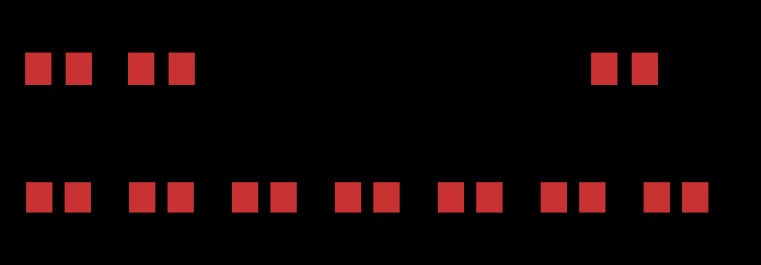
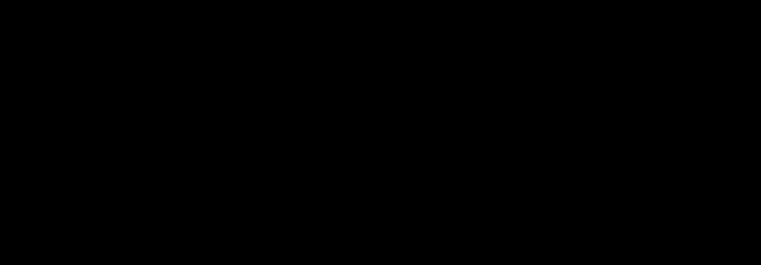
part: (58, 68) -> none
part: (161, 68) -> none
part: (624, 68) -> none
part: (58, 197) -> none
part: (161, 197) -> none
part: (264, 197) -> none
part: (367, 197) -> none
part: (470, 197) -> none
part: (573, 197) -> none
part: (676, 197) -> none

